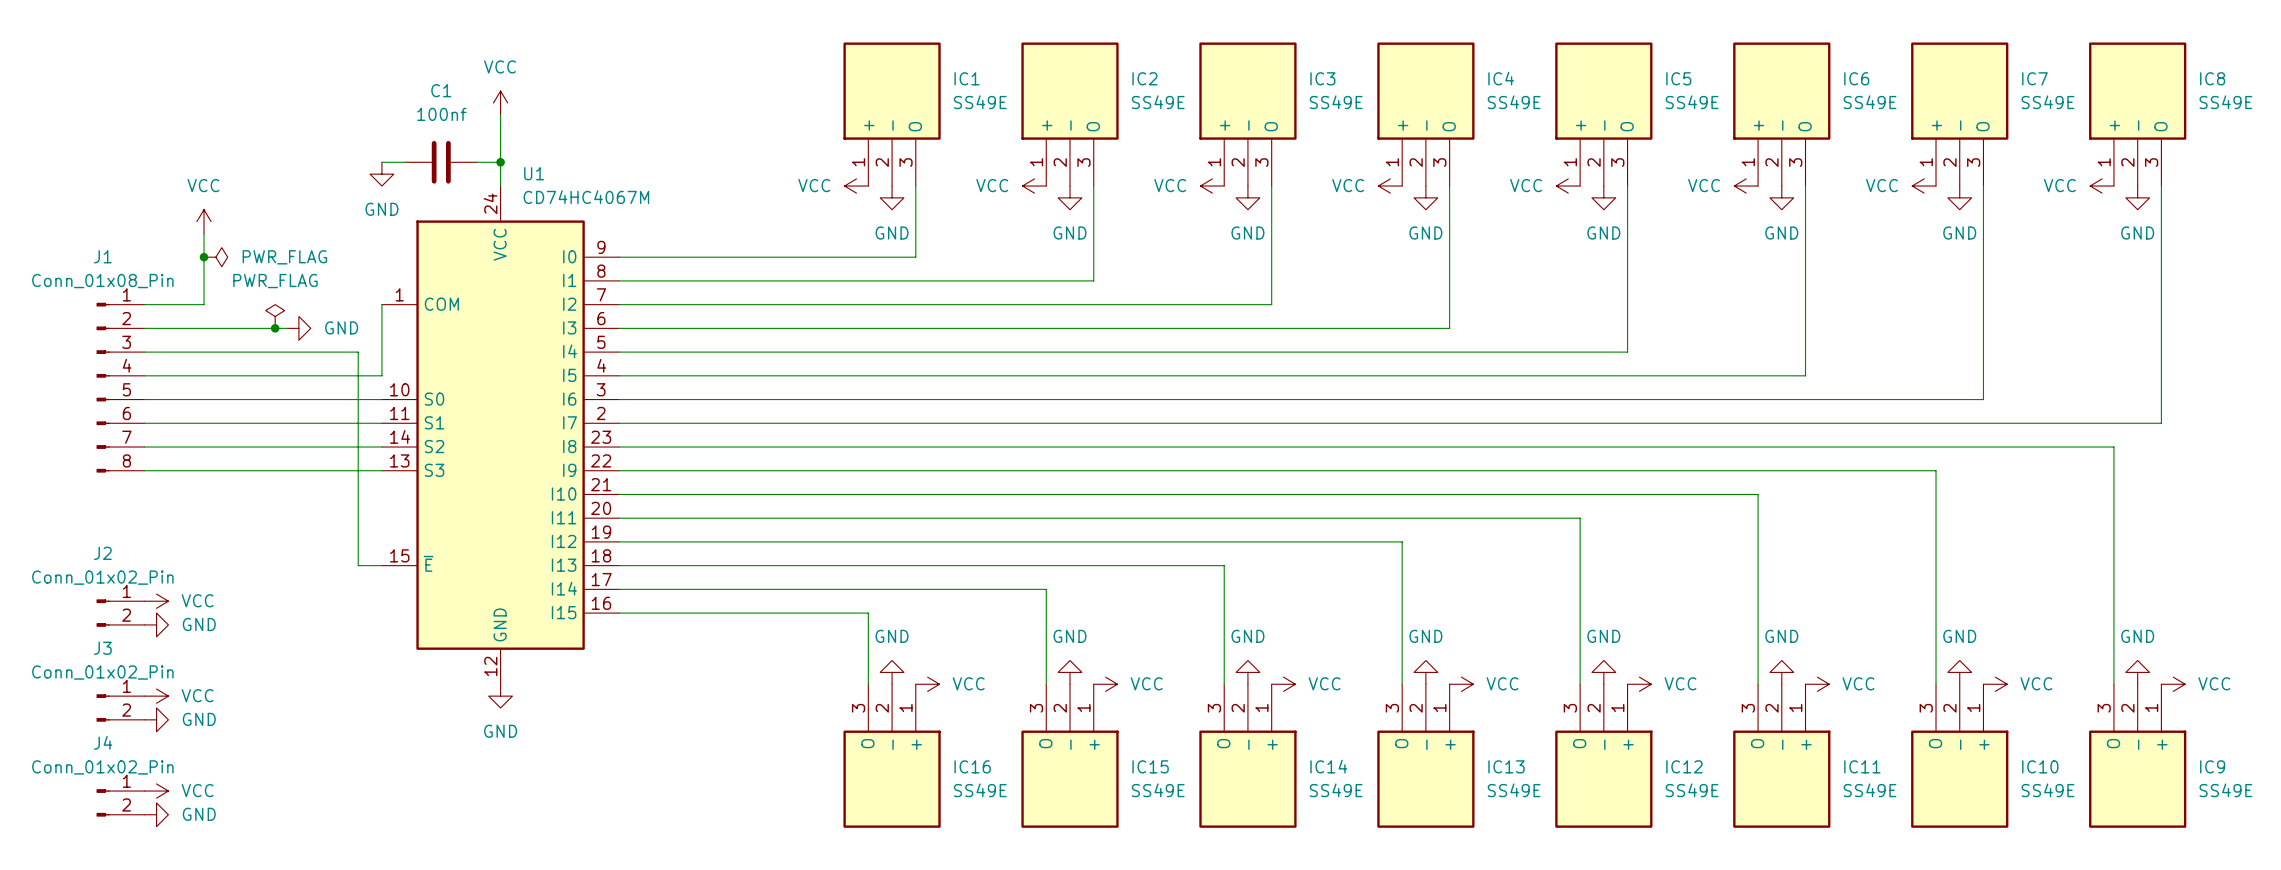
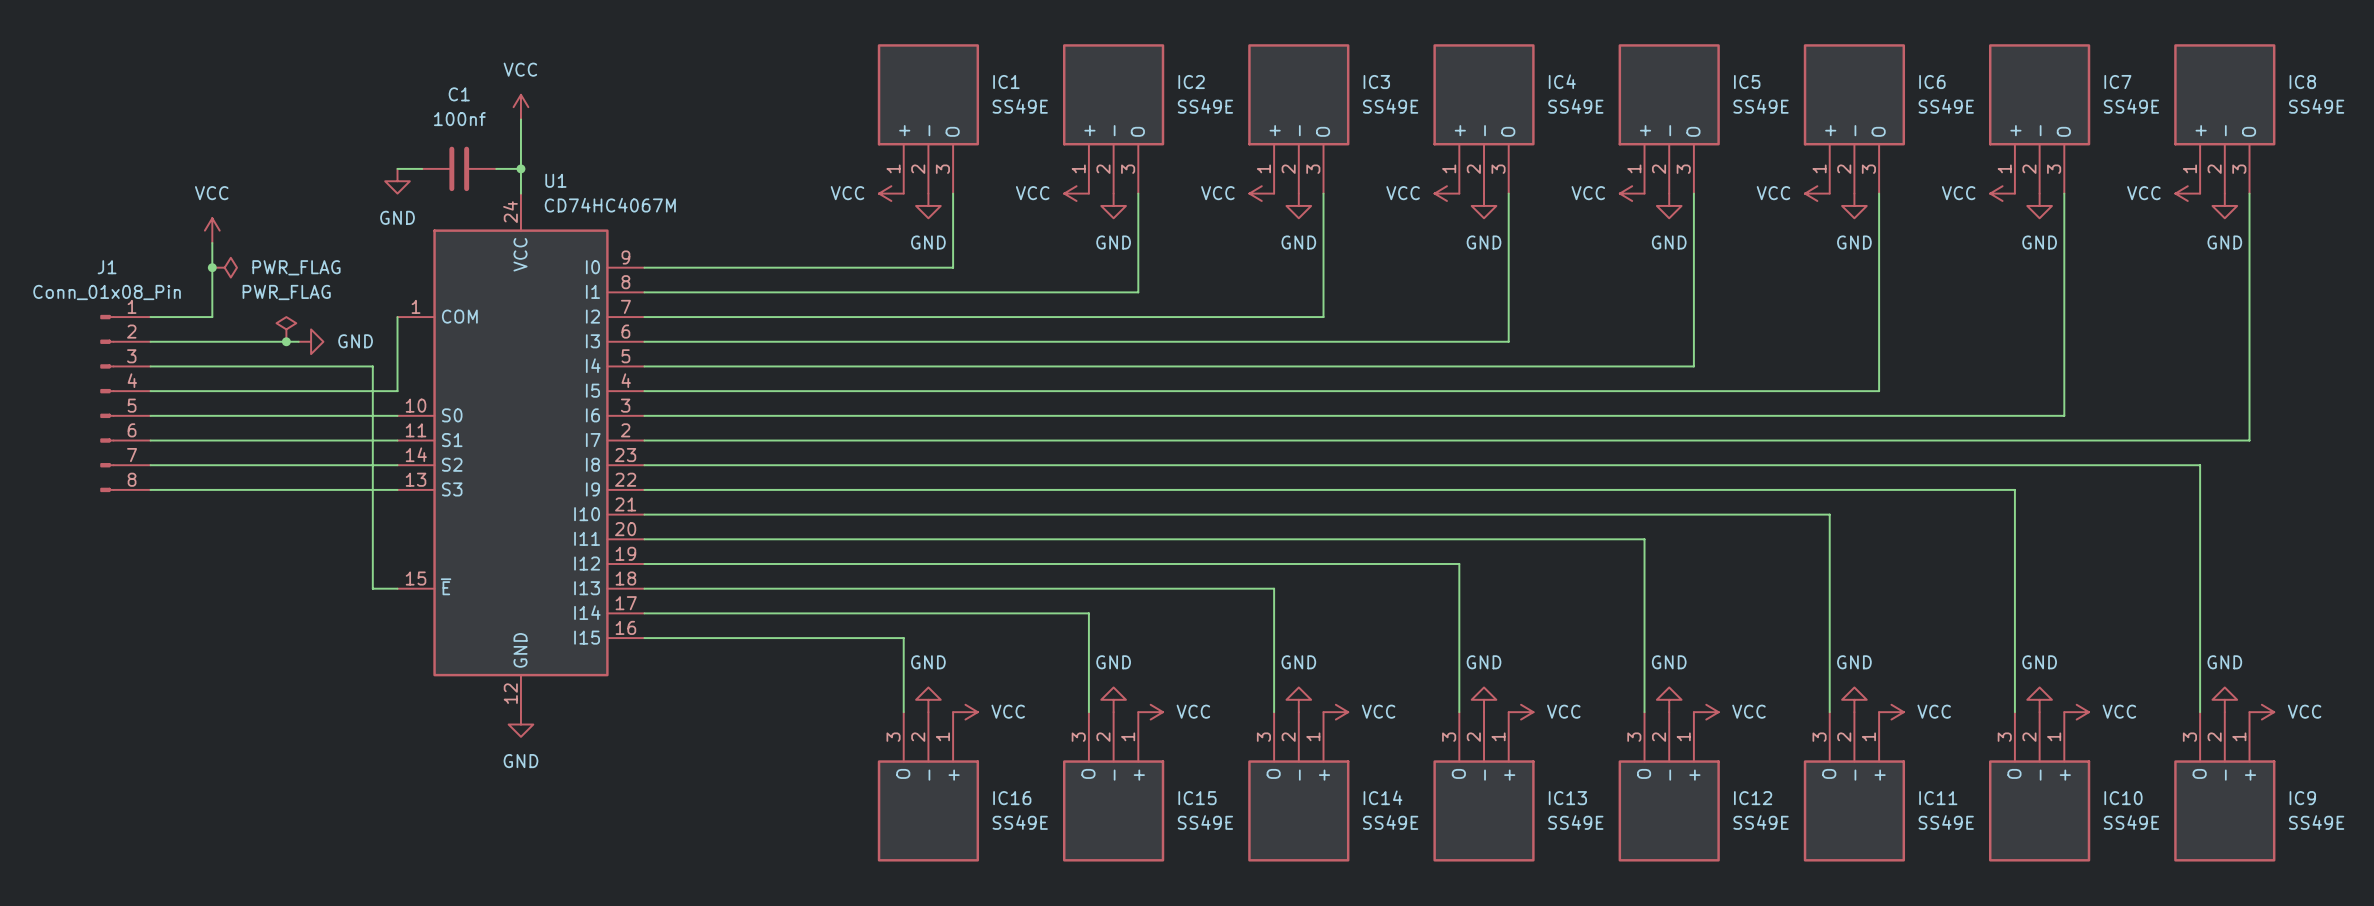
power symbol: VCC (156, 601) -> none
J2: Conn_01x02_Pin (120, 613) -> none
power symbol: GND (156, 624) -> none
power symbol: VCC (156, 696) -> none
J3: Conn_01x02_Pin (120, 707) -> none
power symbol: GND (156, 719) -> none
power symbol: VCC (156, 791) -> none
J4: Conn_01x02_Pin (120, 802) -> none
power symbol: GND (156, 814) -> none

